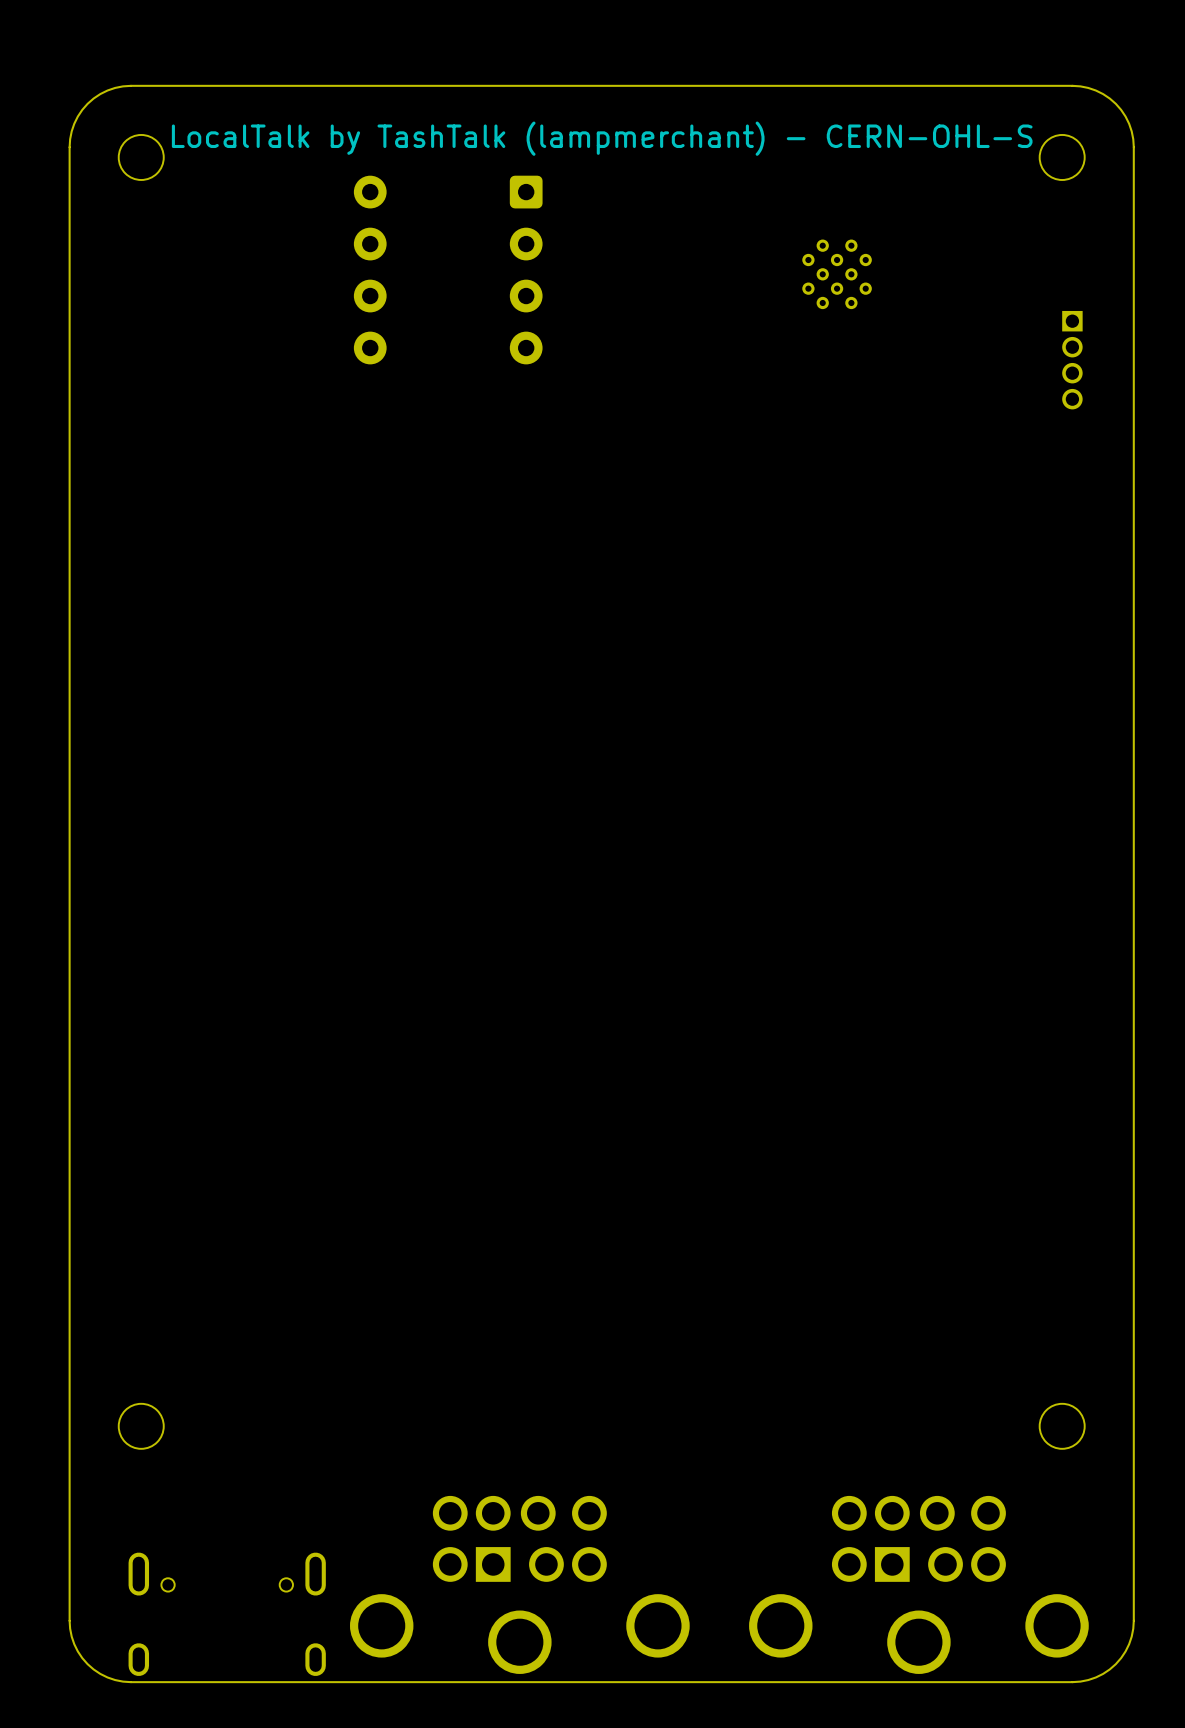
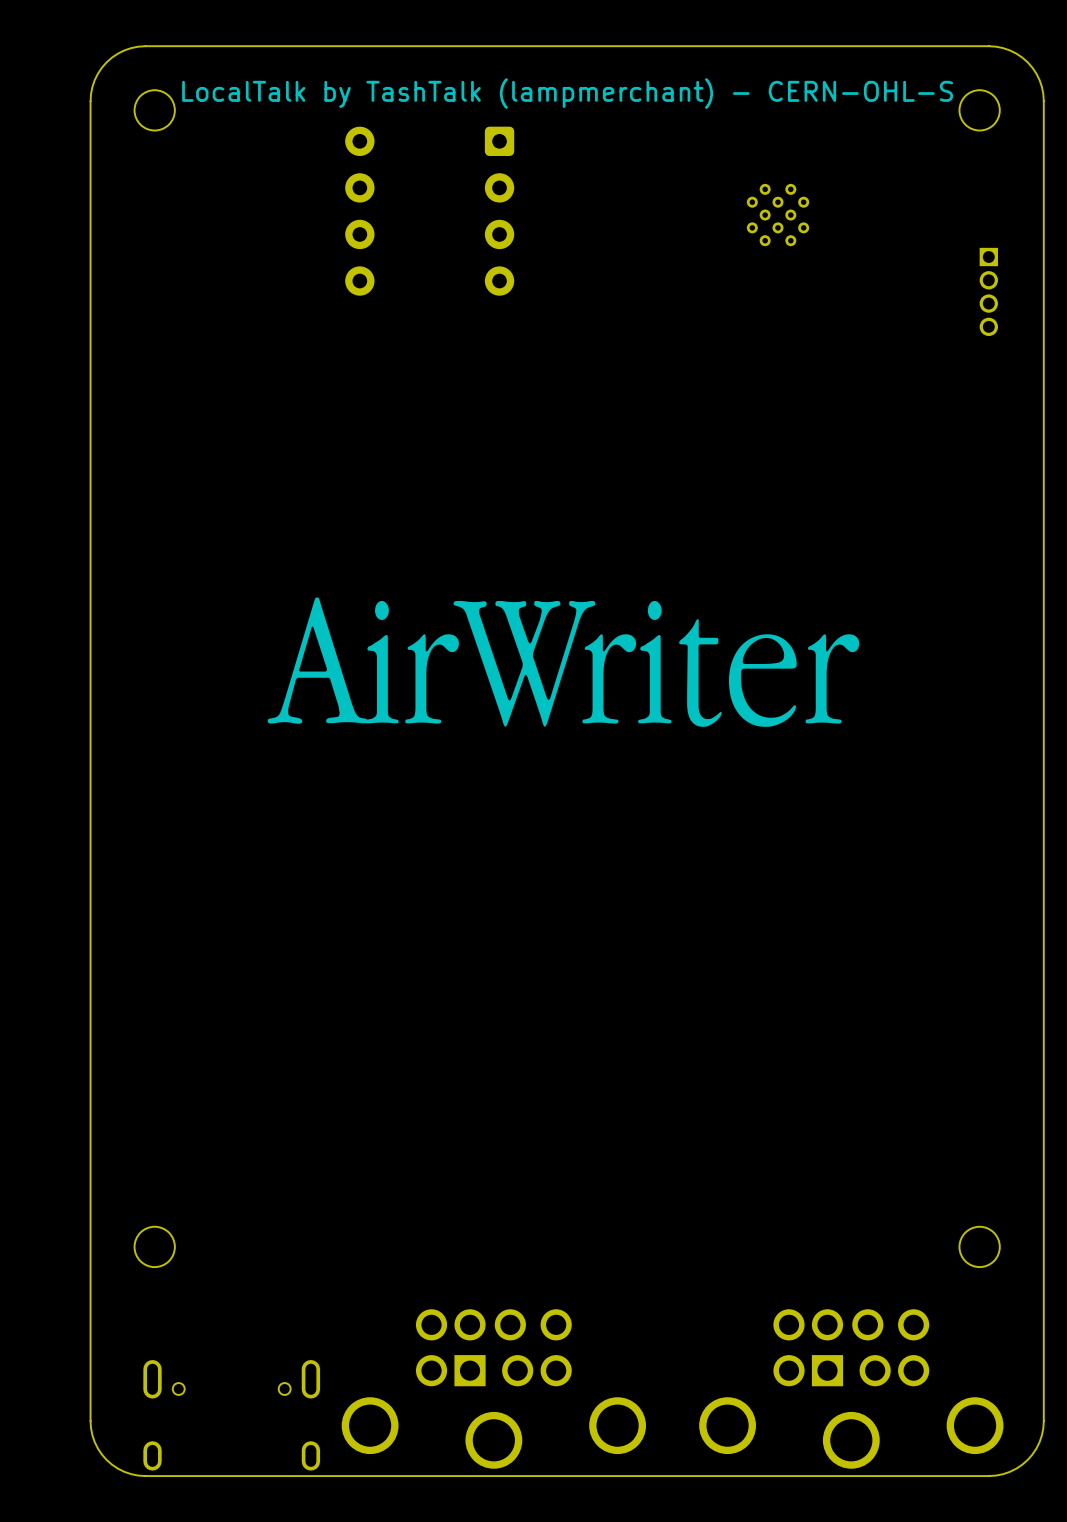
drawing: none -> [267, 597, 860, 727]

